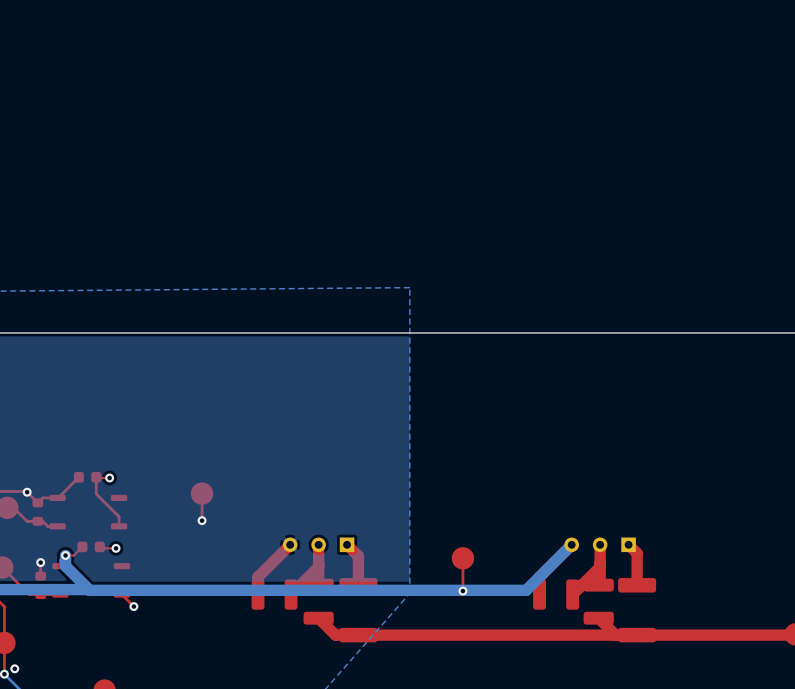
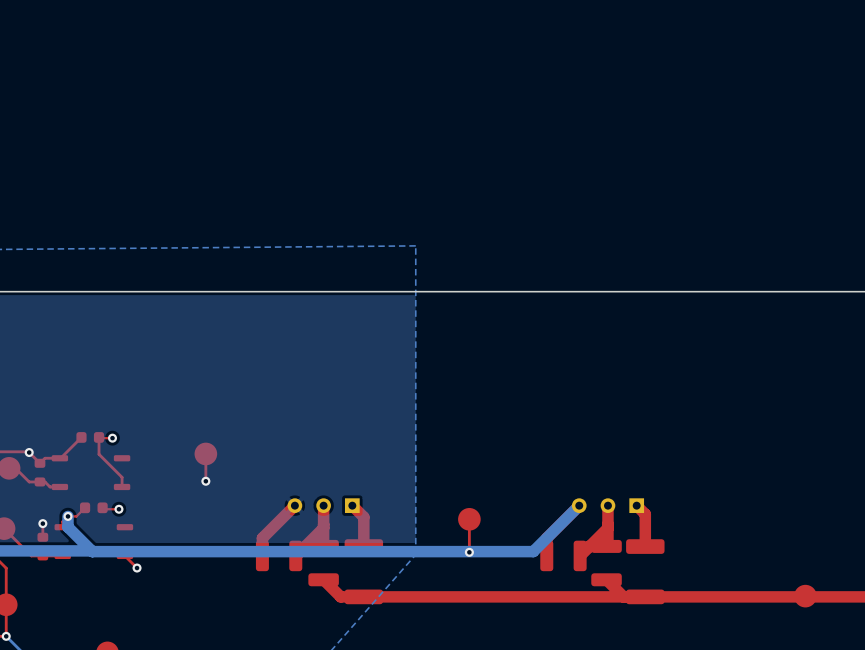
via: (14, 668) -> none

